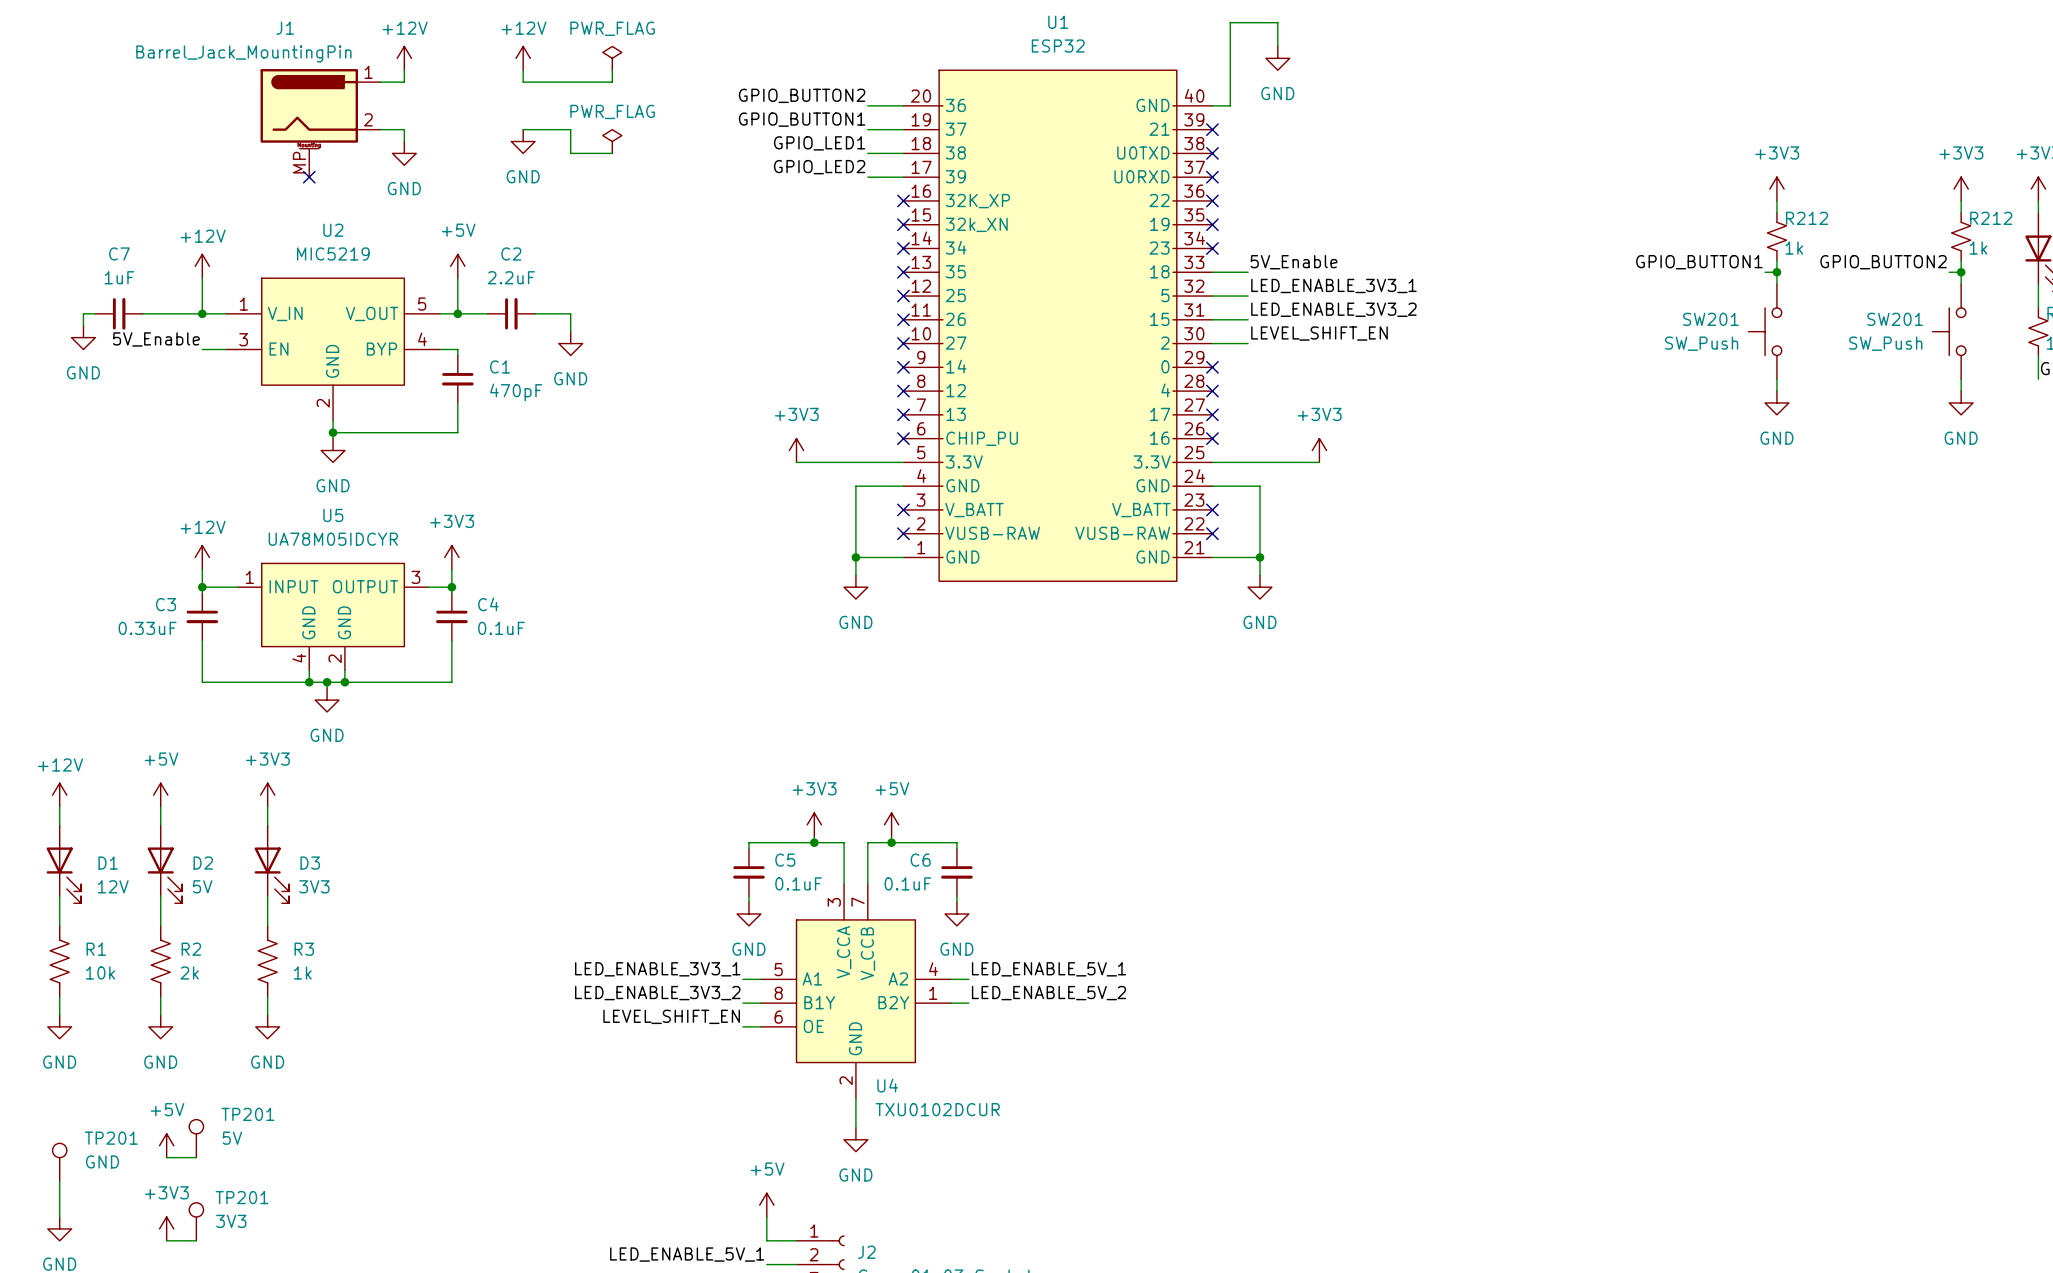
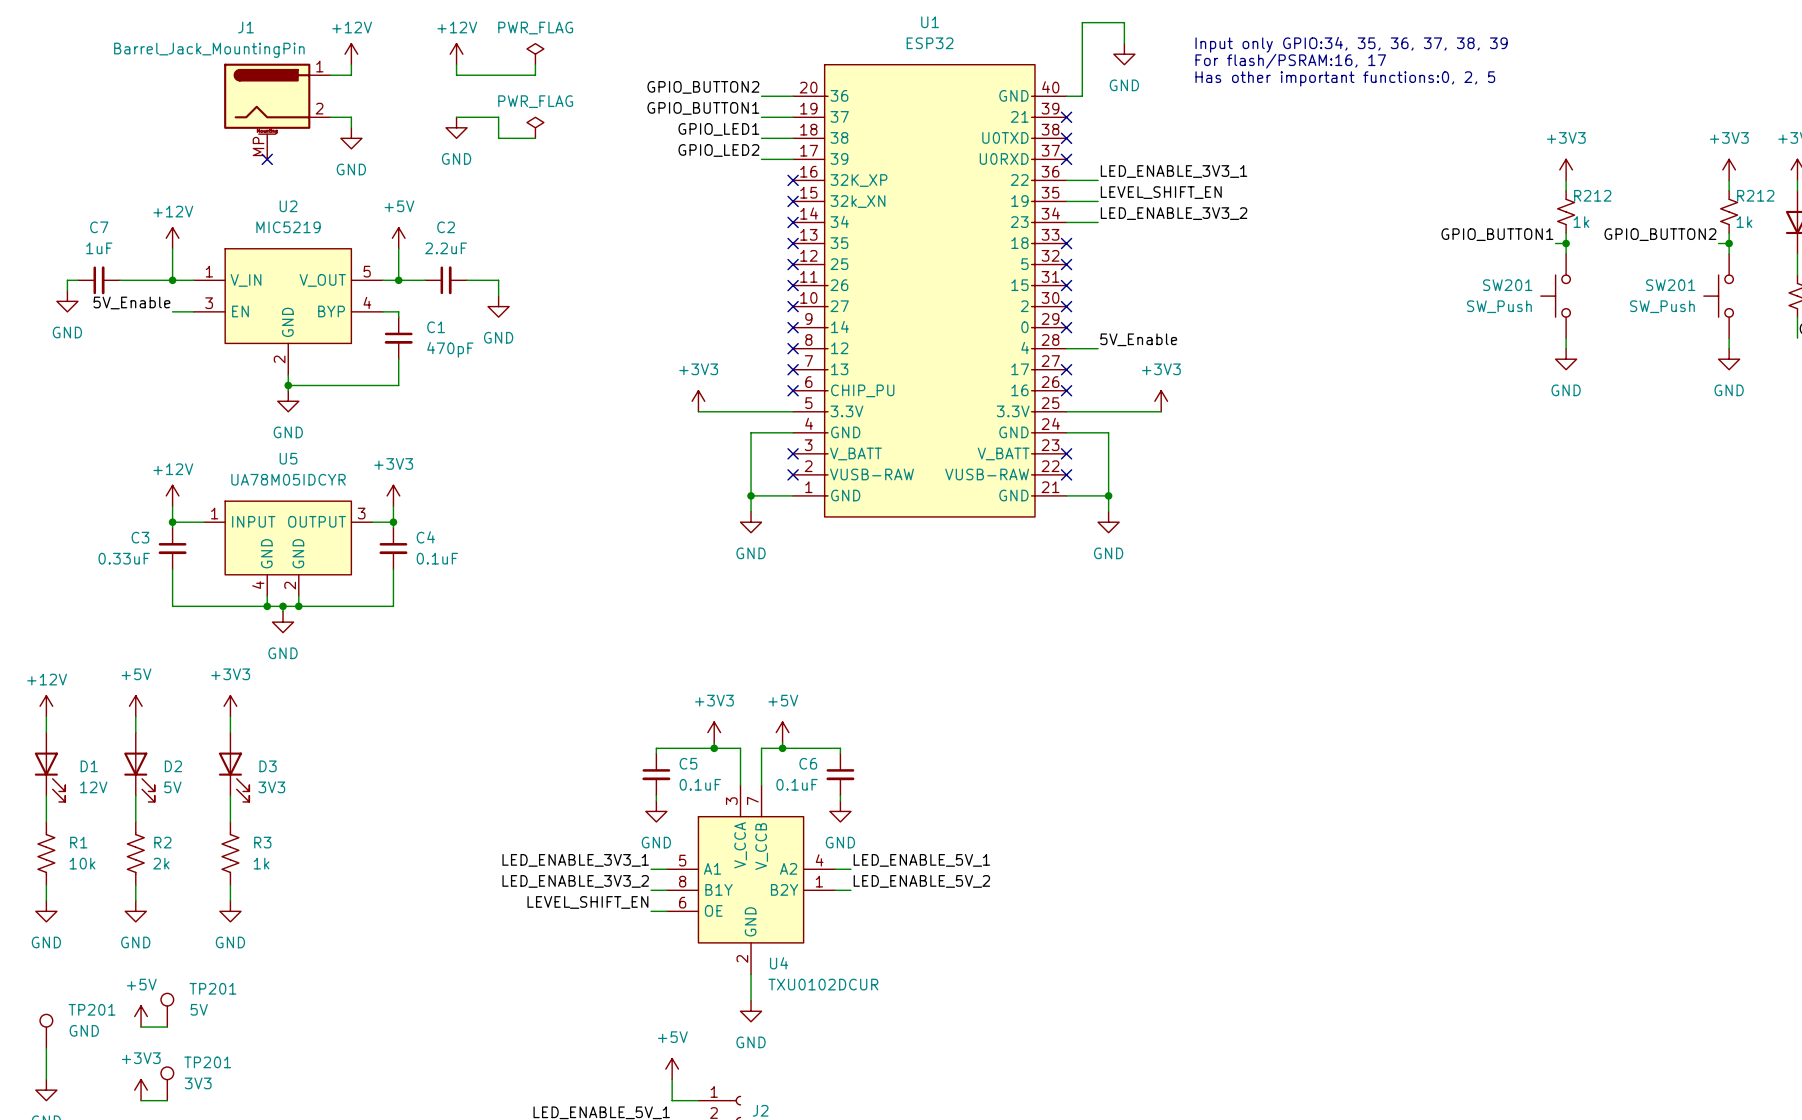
text: none -> Input only GPIO:34, 35, 36, 37, 38, 39 (1351, 44)
text: none -> For flash/PSRAM:16, 17 (1290, 61)
text: none -> Has other important functions:0, 2, 5 (1345, 78)
no-connect mark: (1212, 200) -> none
no-connect mark: (1212, 224) -> none
no-connect mark: (1212, 248) -> none
label position: 5V_Enable (1294, 262) -> 5V_Enable (1138, 339)
wire: (1212, 272) (1248, 272) -> (1066, 180) (1098, 180)
no-connect mark: none -> (1066, 243)
label position: LED_ENABLE_3V3_1 (1333, 285) -> LED_ENABLE_3V3_1 (1174, 171)
wire: (1212, 296) (1248, 296) -> (1066, 201) (1098, 201)
no-connect mark: none -> (1066, 264)
label position: LED_ENABLE_3V3_2 (1333, 309) -> LED_ENABLE_3V3_2 (1174, 213)
wire: (1212, 319) (1248, 319) -> (1066, 222) (1098, 222)
no-connect mark: none -> (1066, 285)
label position: LEVEL_SHIFT_EN (1319, 333) -> LEVEL_SHIFT_EN (1161, 192)
wire: (1212, 343) (1248, 343) -> (1066, 348) (1098, 348)
no-connect mark: none -> (1066, 306)
no-connect mark: (1212, 391) -> none

